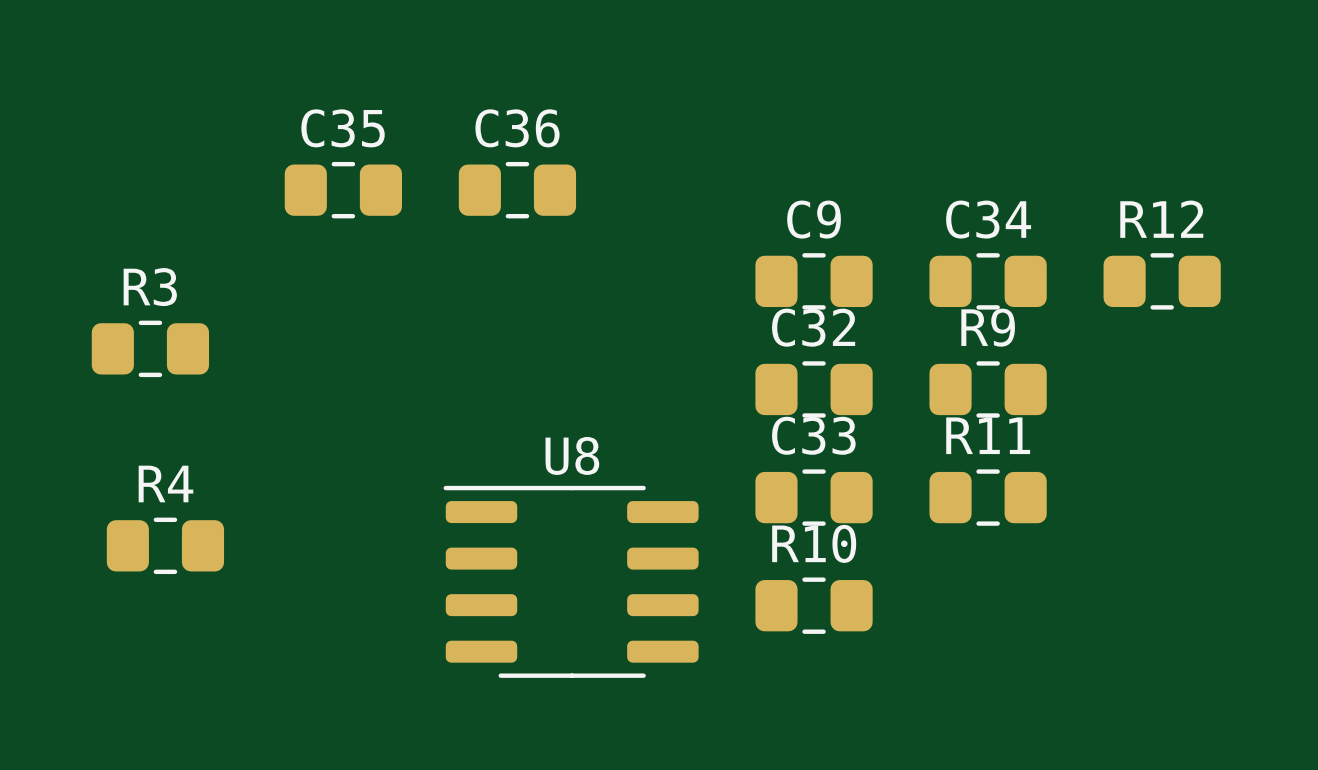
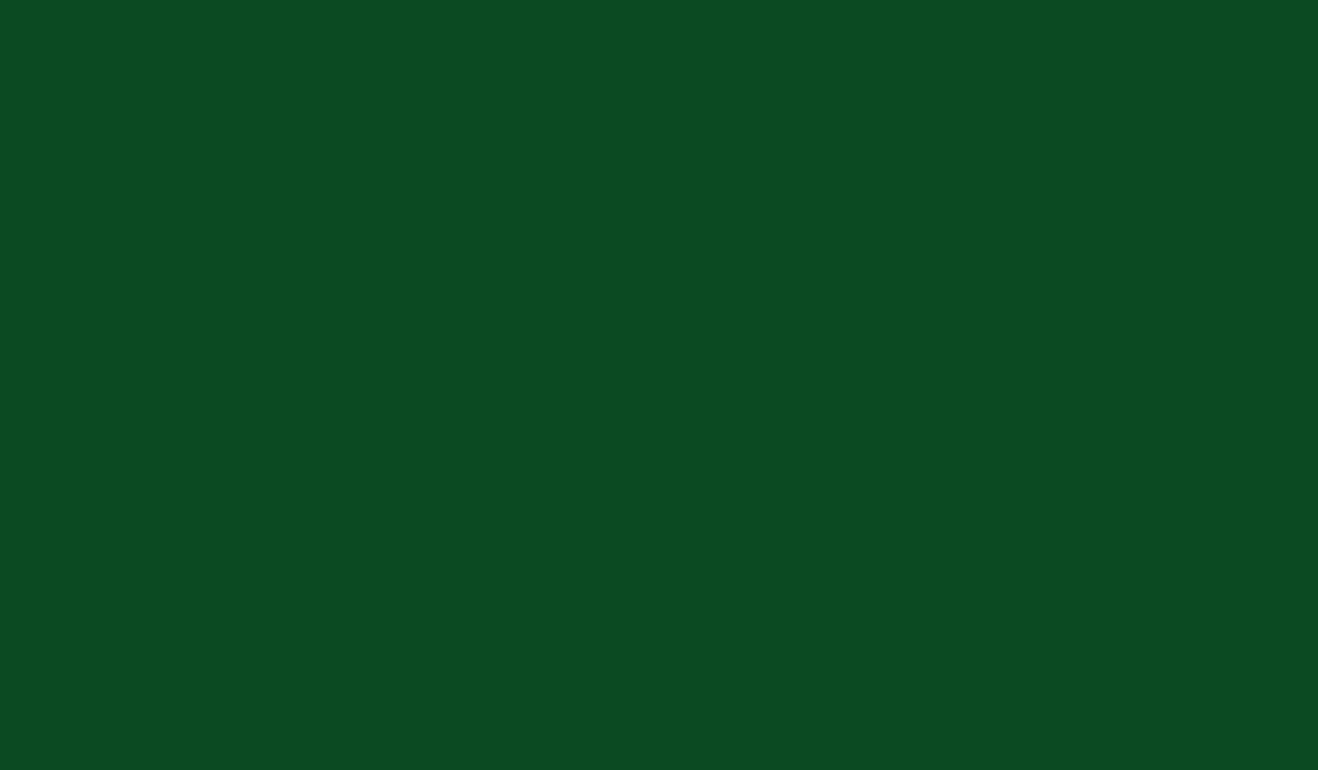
C35: (343, 190) -> none
C36: (517, 190) -> none
C9: (814, 281) -> none
C34: (988, 281) -> none
R12: (1162, 281) -> none
R3: (150, 348) -> none
C32: (814, 389) -> none
R9: (988, 389) -> none
C33: (814, 497) -> none
R11: (988, 497) -> none
R4: (165, 545) -> none
U8: (571, 581) -> none
R10: (814, 605) -> none

